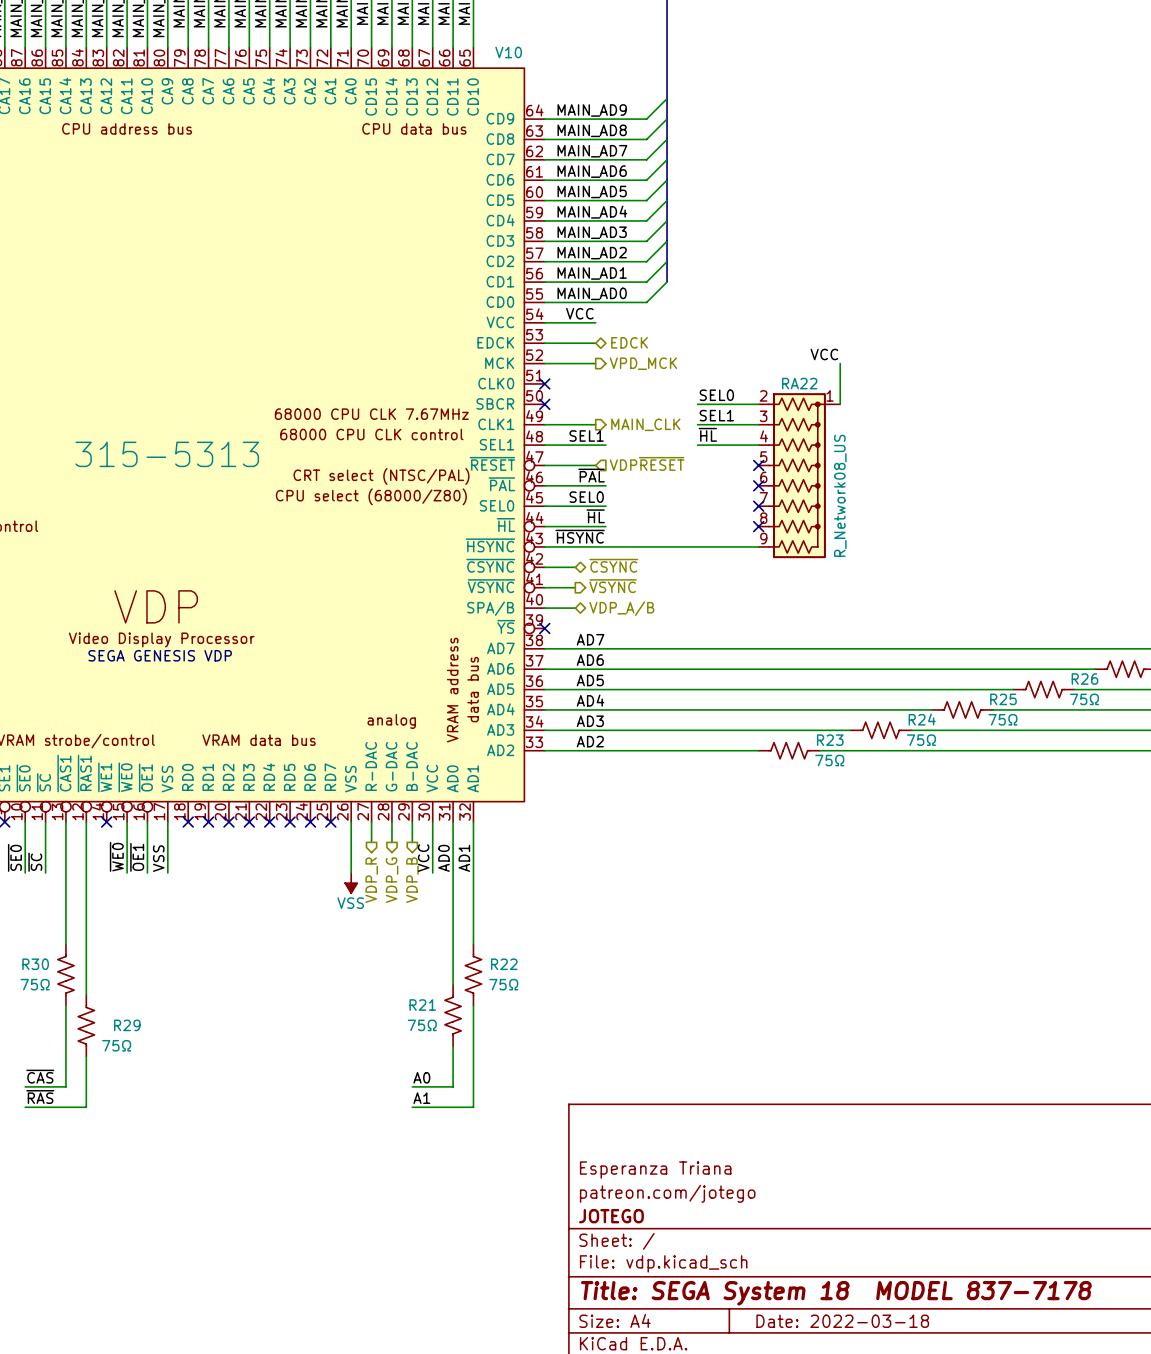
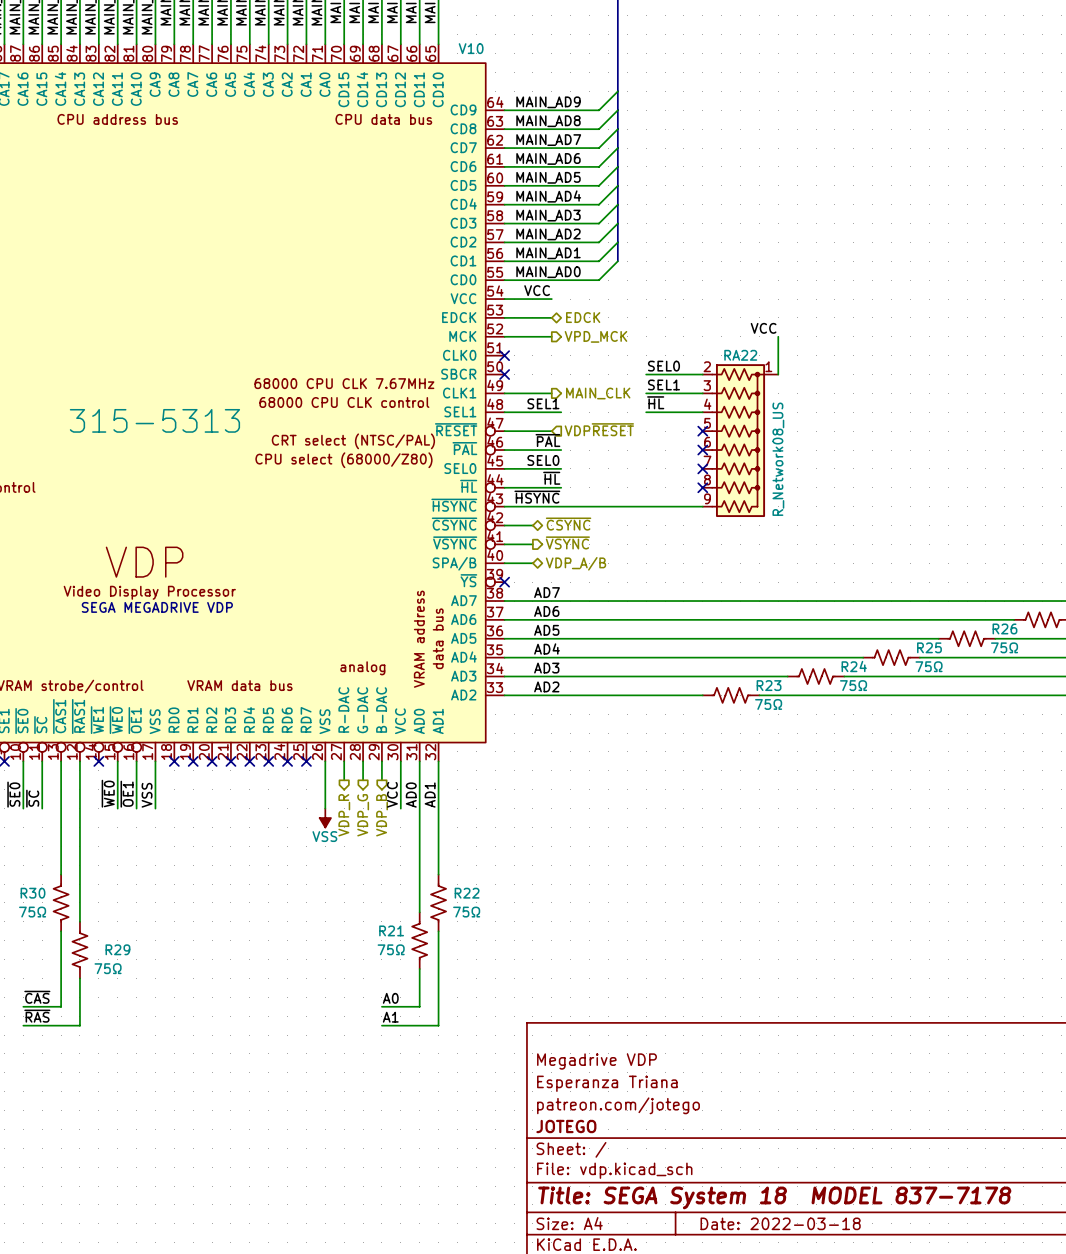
text: SEGA GENESIS VDP (160, 655) -> SEGA MEGADRIVE VDP (157, 607)
title block: none -> Megadrive VDP (596, 1061)

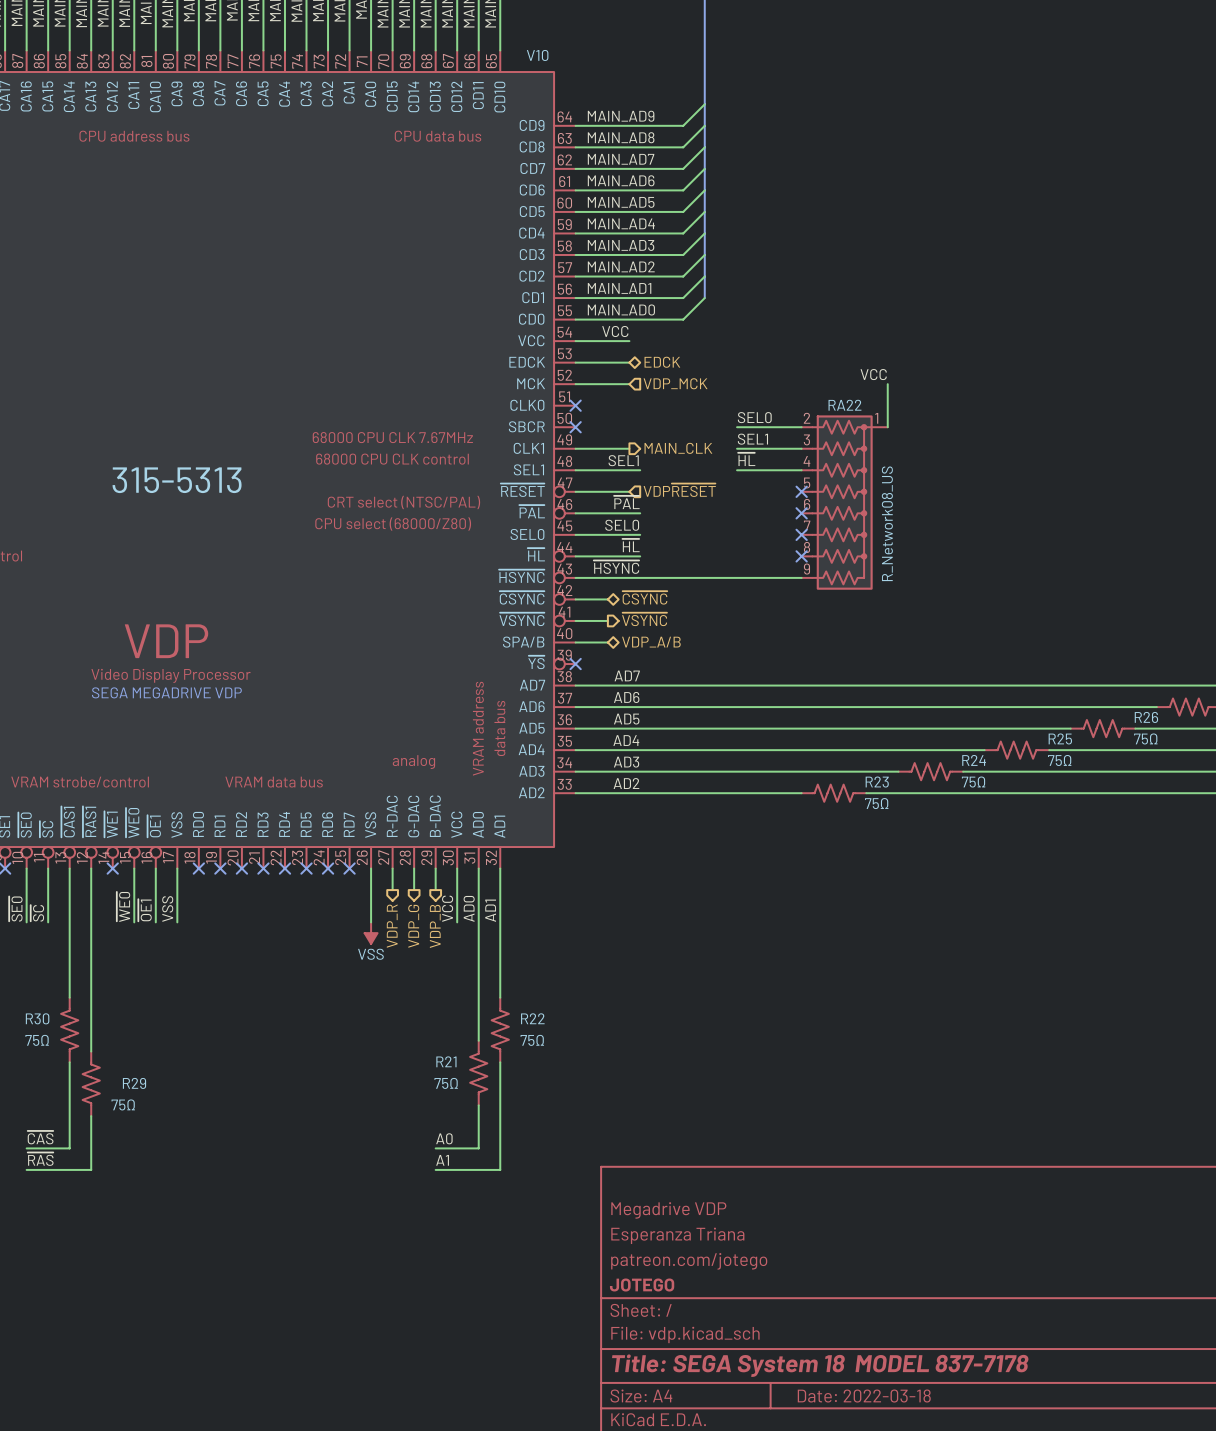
hierarchical label shape: output (595, 336) -> input (675, 383)
hierarchical label: VPD_MCK (595, 336) -> VDP_MCK (675, 383)

